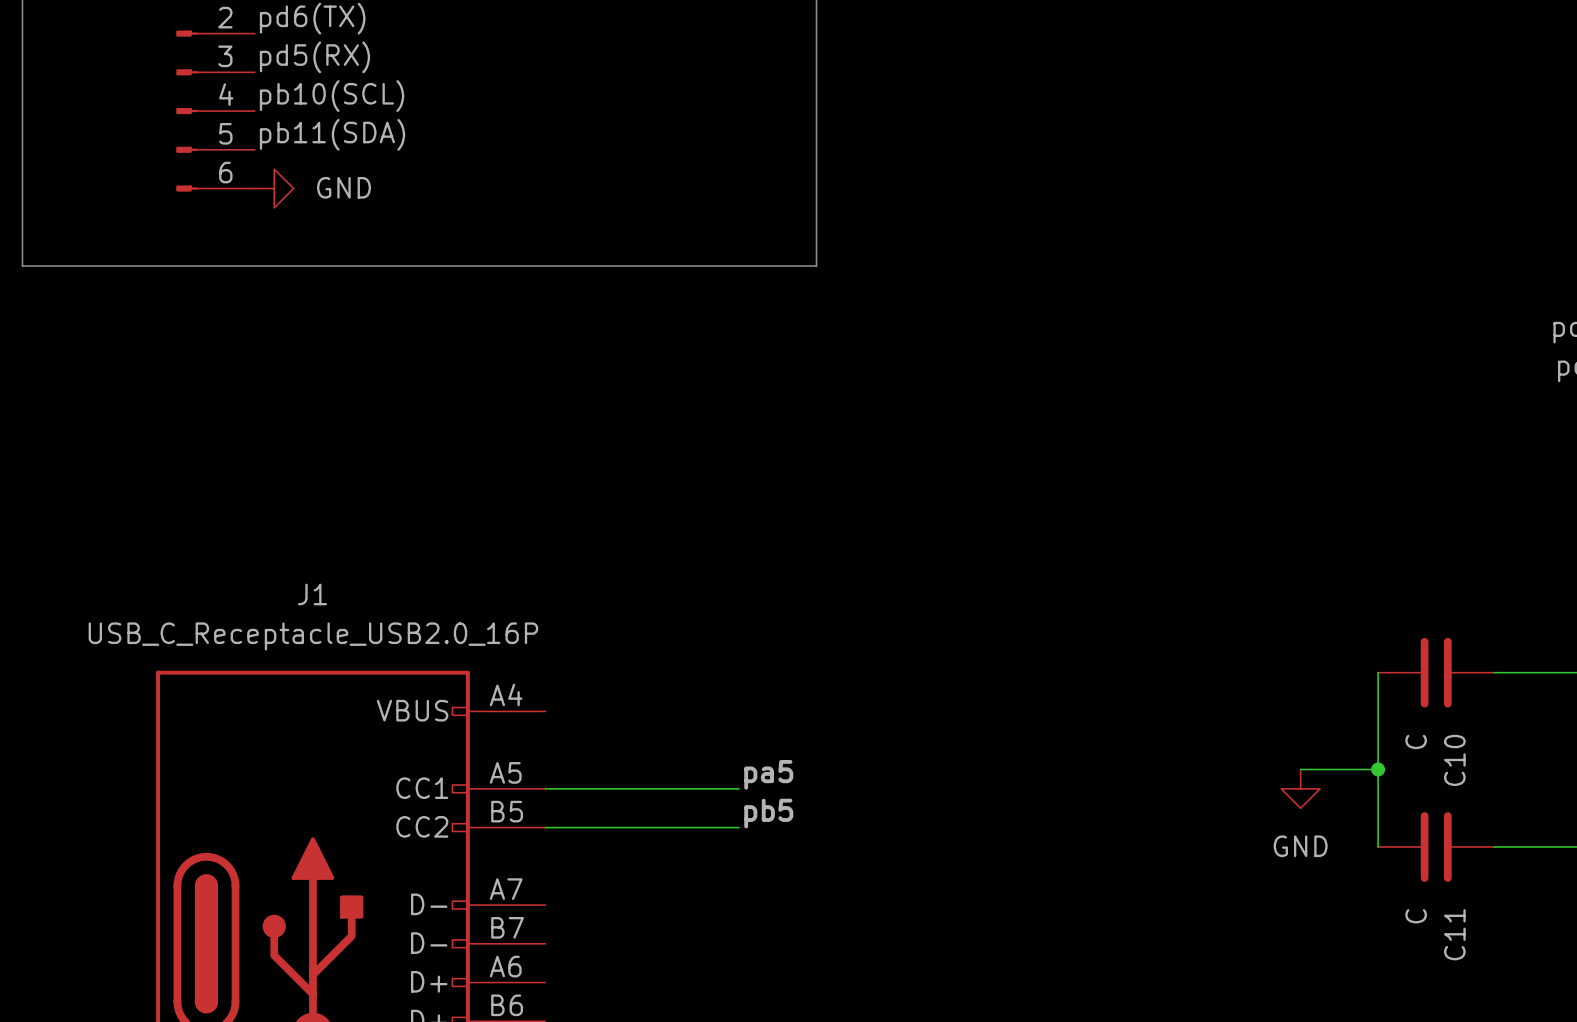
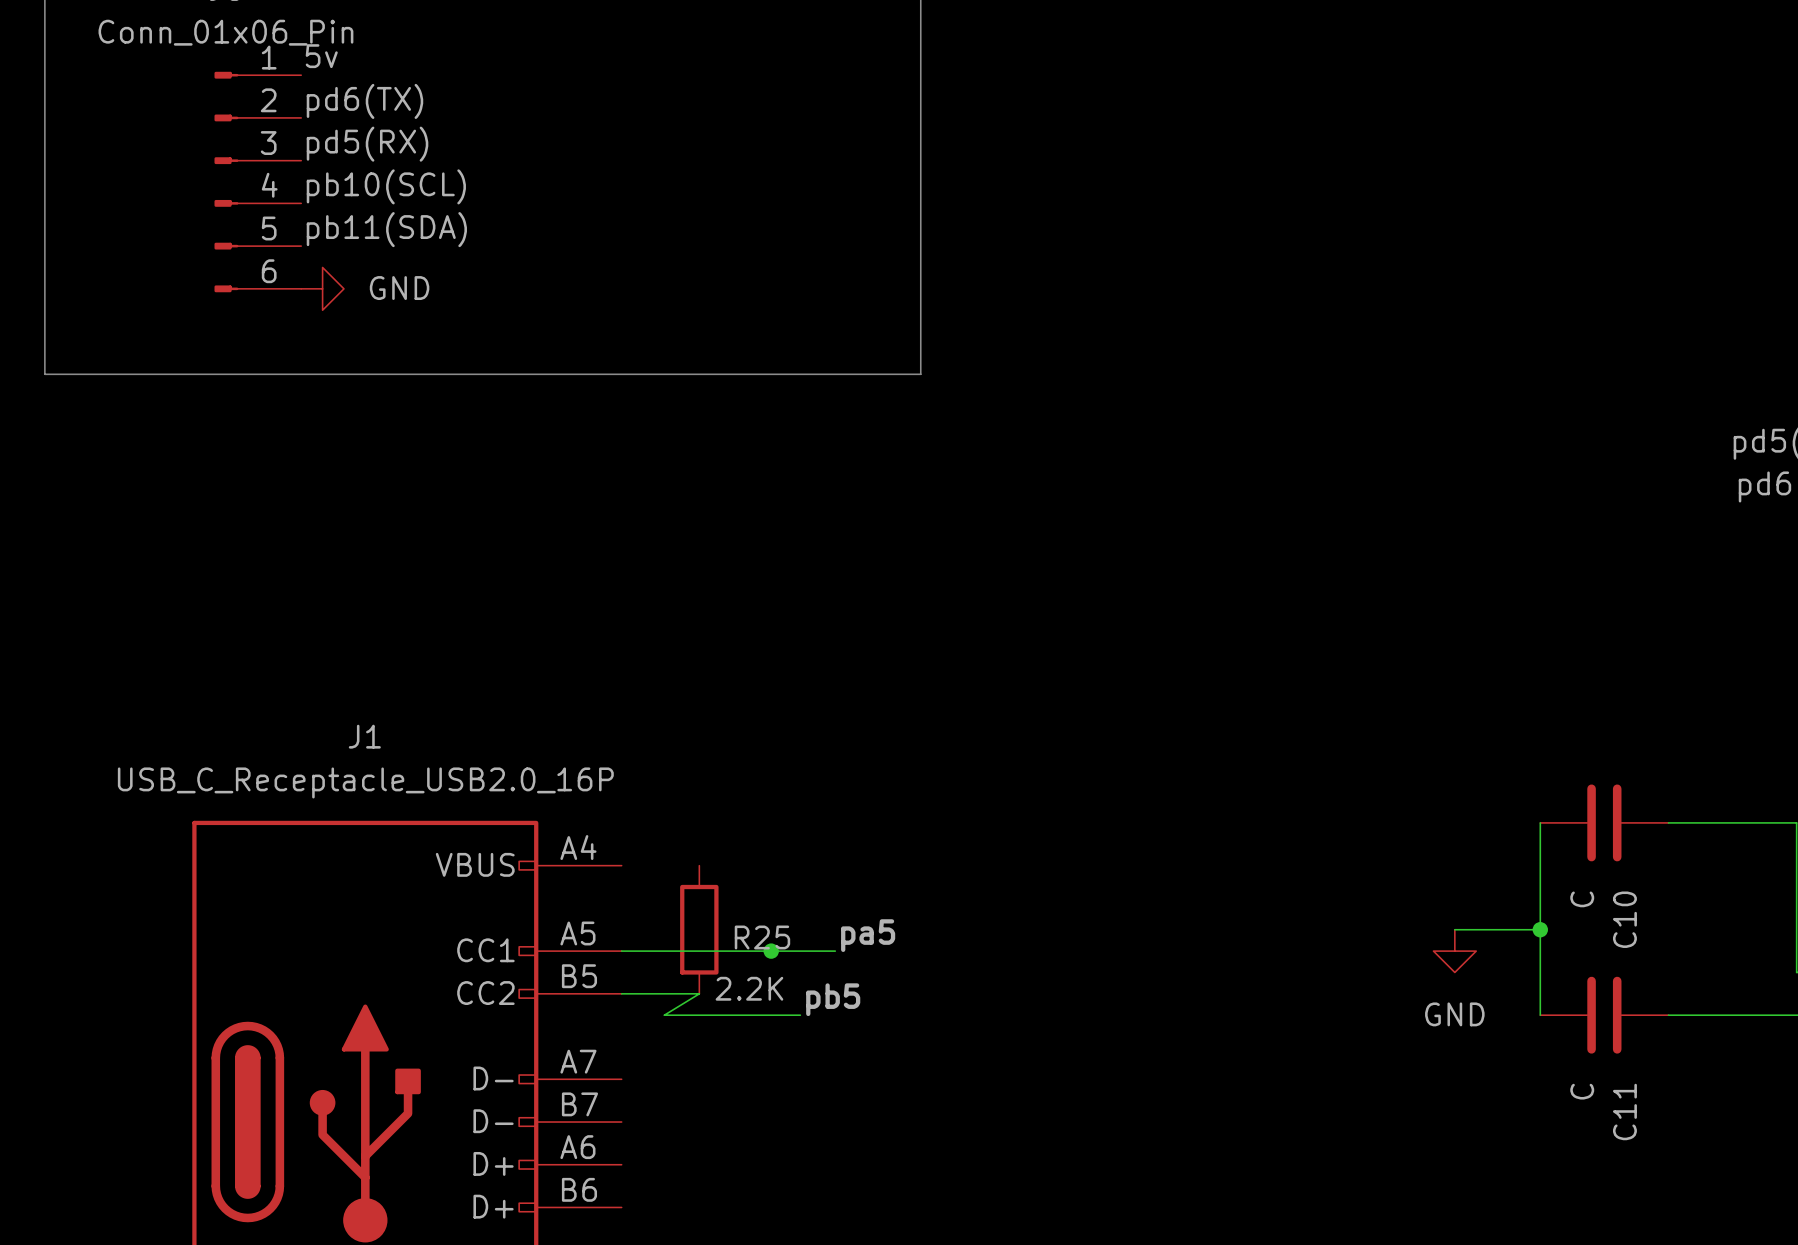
R25: none -> 2.2K (699, 929)
junction: none -> (771, 951)
label position: pb5 (768, 813) -> pb5 (833, 999)
wire: (615, 827) (739, 827) -> (699, 993) (664, 1015) (800, 1015)

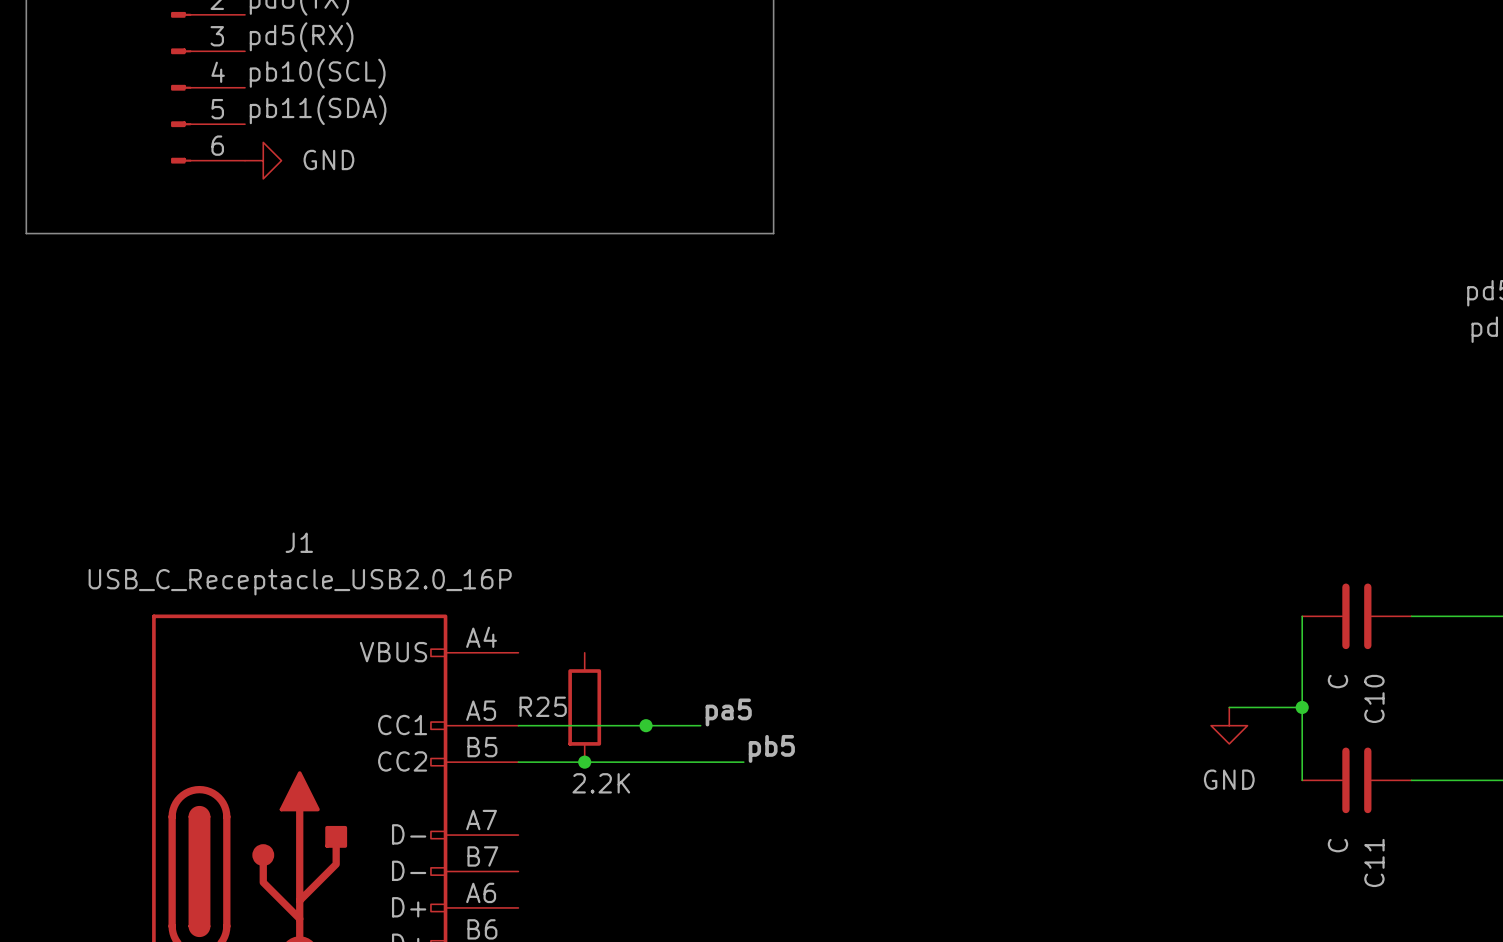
R25 name position: R25 (762, 937) -> R25 (543, 706)
R25 value position: 2.2K (749, 988) -> 2.2K (601, 783)
wire: (699, 993) (664, 1015) (800, 1015) -> (584, 762) (743, 762)
junction: none -> (584, 762)
label position: pb5 (833, 999) -> pb5 (771, 748)

